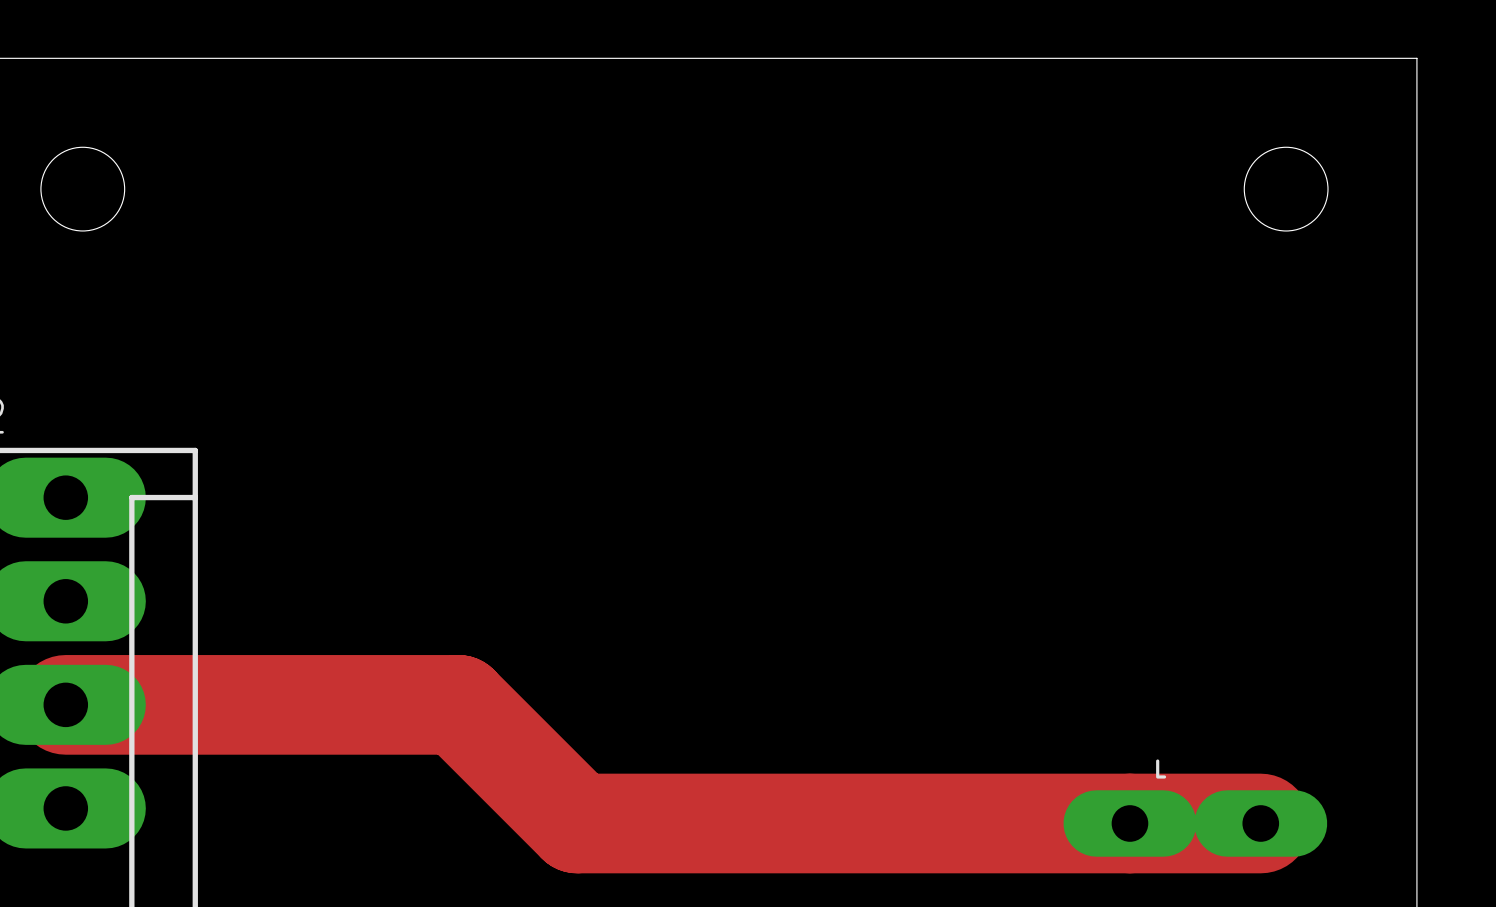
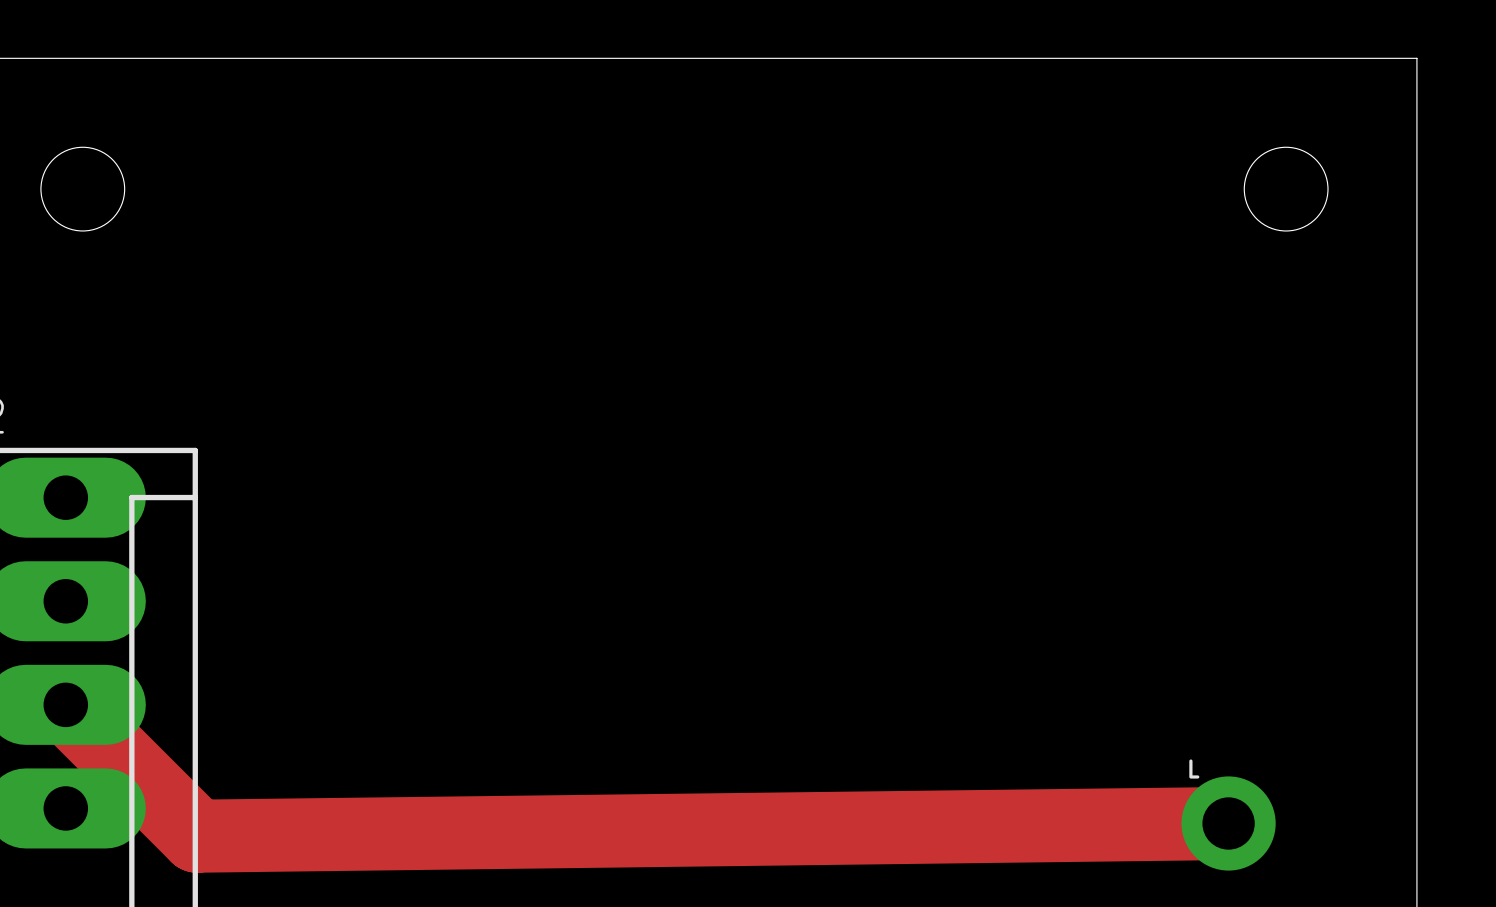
track: (65, 704) (458, 704) (577, 823) (1260, 823) -> (65, 704) (197, 836) (1228, 823)
L: (1195, 823) -> none
L: none -> (1228, 823)

